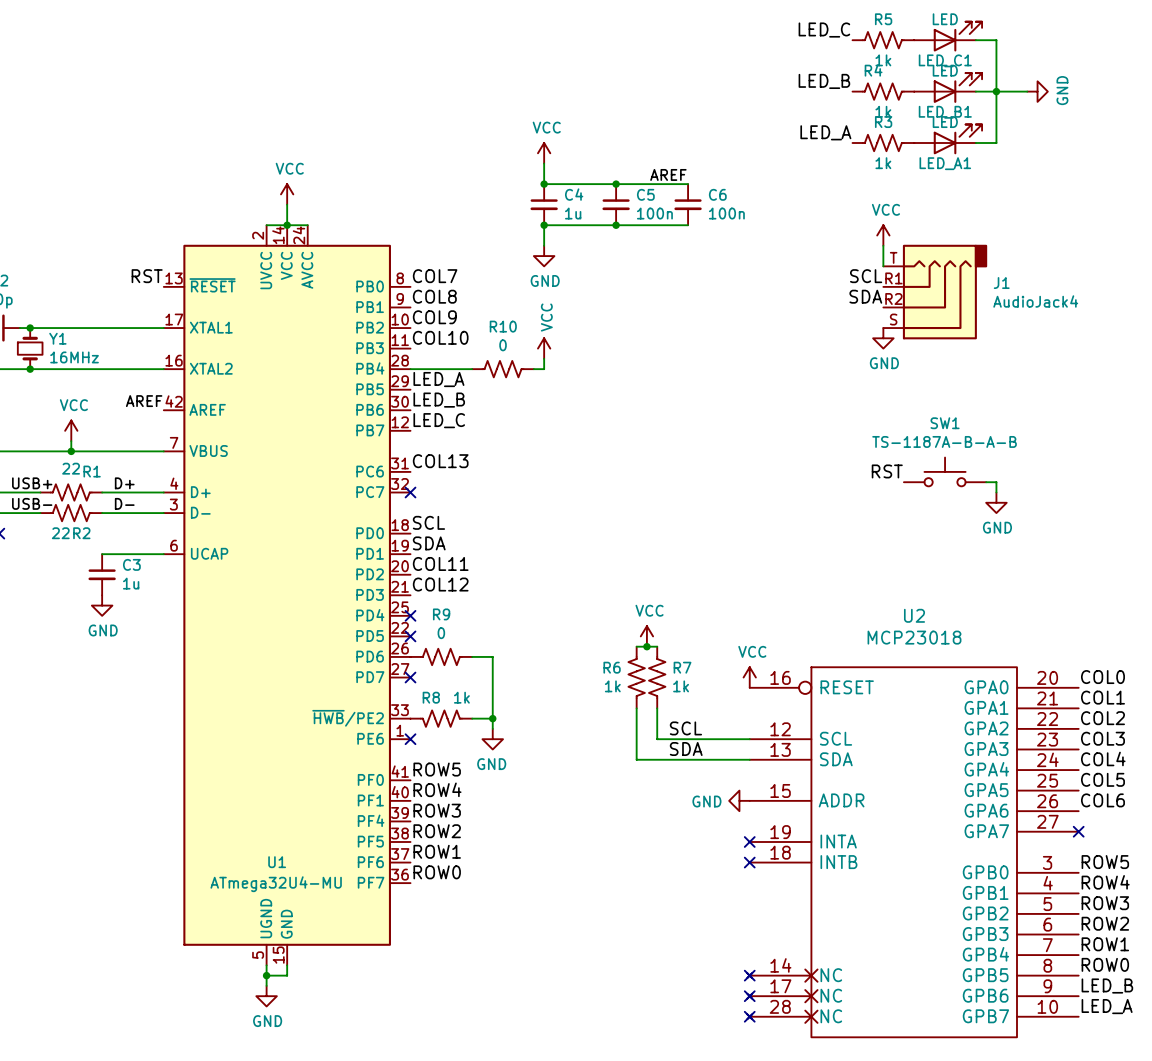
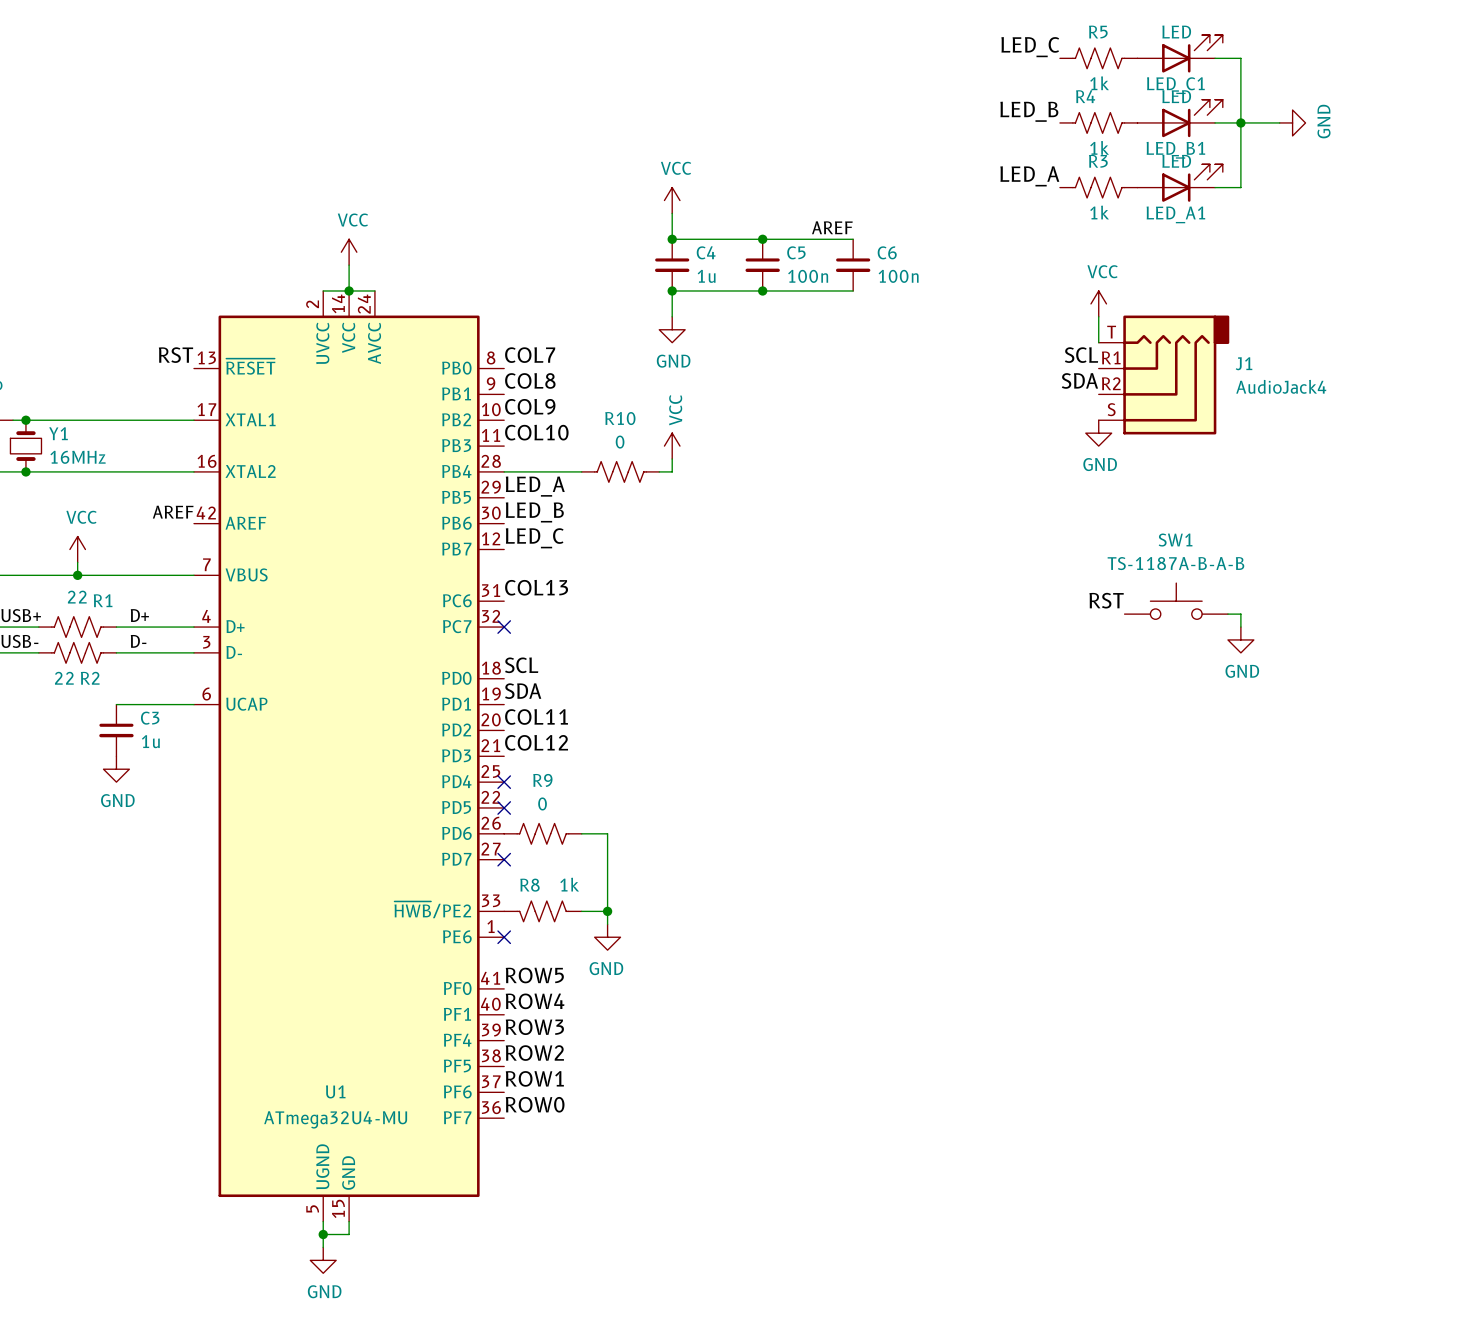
power symbol: VCC (646, 636) -> none
wire: (636, 646) (657, 646) -> none
junction: (646, 646) -> none
R6: 1k (636, 677) -> none
R7: 1k (657, 677) -> none
power symbol: VCC (749, 677) -> none
label: COL0 (1102, 677) -> none
label: COL1 (1102, 697) -> none
wire: (636, 708) (636, 759) (749, 759) -> none
wire: (657, 708) (657, 739) (749, 739) -> none
label: COL2 (1102, 718) -> none
label: SCL (685, 728) -> none
label: COL3 (1102, 738) -> none
label: SDA (686, 749) -> none
label: COL4 (1103, 758) -> none
label: COL5 (1102, 779) -> none
power symbol: GND (739, 800) -> none
label: COL6 (1102, 800) -> none
no-connect mark: (1078, 831) -> none
no-connect mark: (749, 841) -> none
U2: MCP23018 (912, 852) -> none
no-connect mark: (749, 862) -> none
label: ROW5 (1105, 862) -> none
label: ROW4 (1105, 882) -> none
label: ROW3 (1105, 903) -> none
label: ROW2 (1105, 923) -> none
label: ROW1 (1105, 944) -> none
label: ROW0 (1105, 964) -> none
no-connect mark: (749, 975) -> none
label: LED_B (1107, 986) -> none
no-connect mark: (749, 996) -> none
label: LED_A (1107, 1006) -> none
no-connect mark: (749, 1016) -> none

